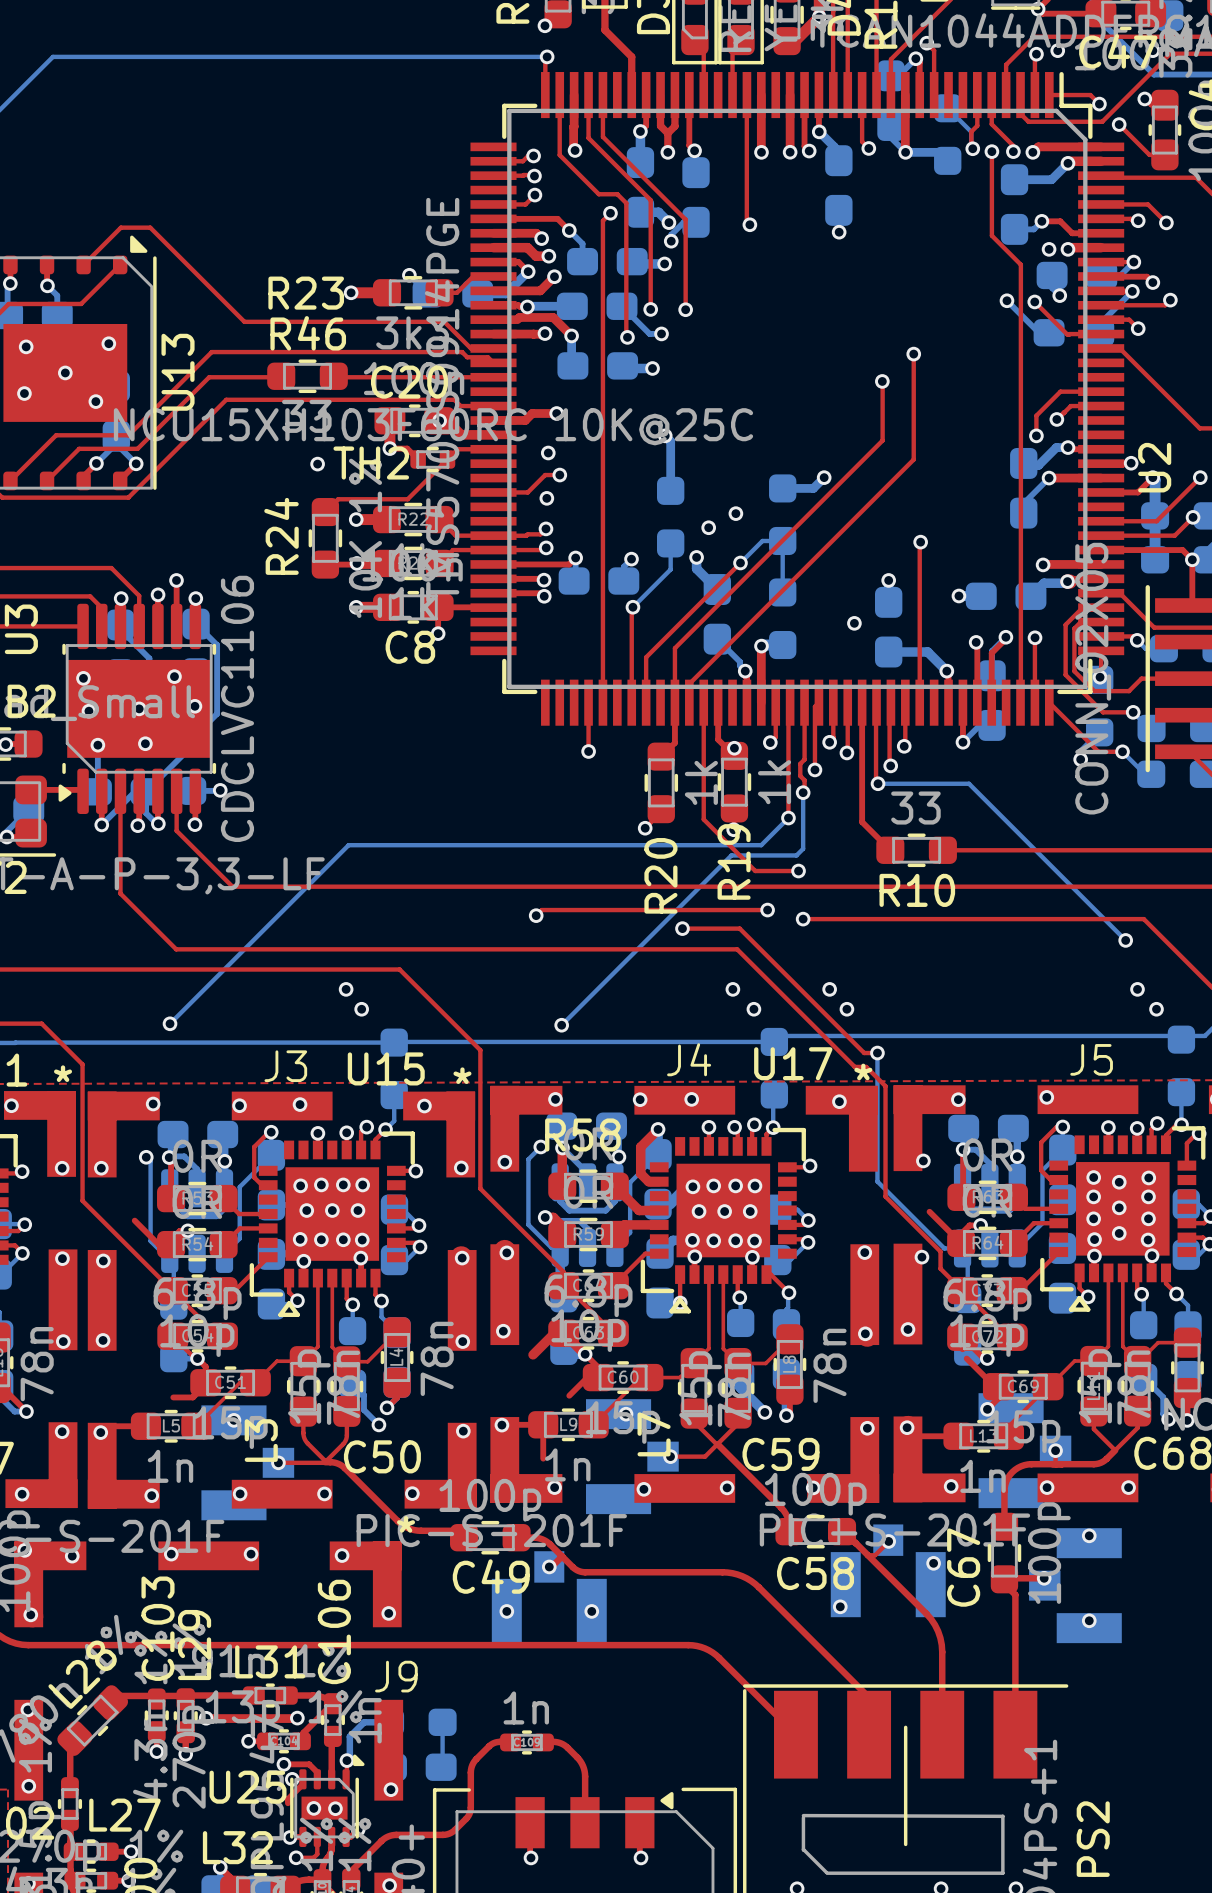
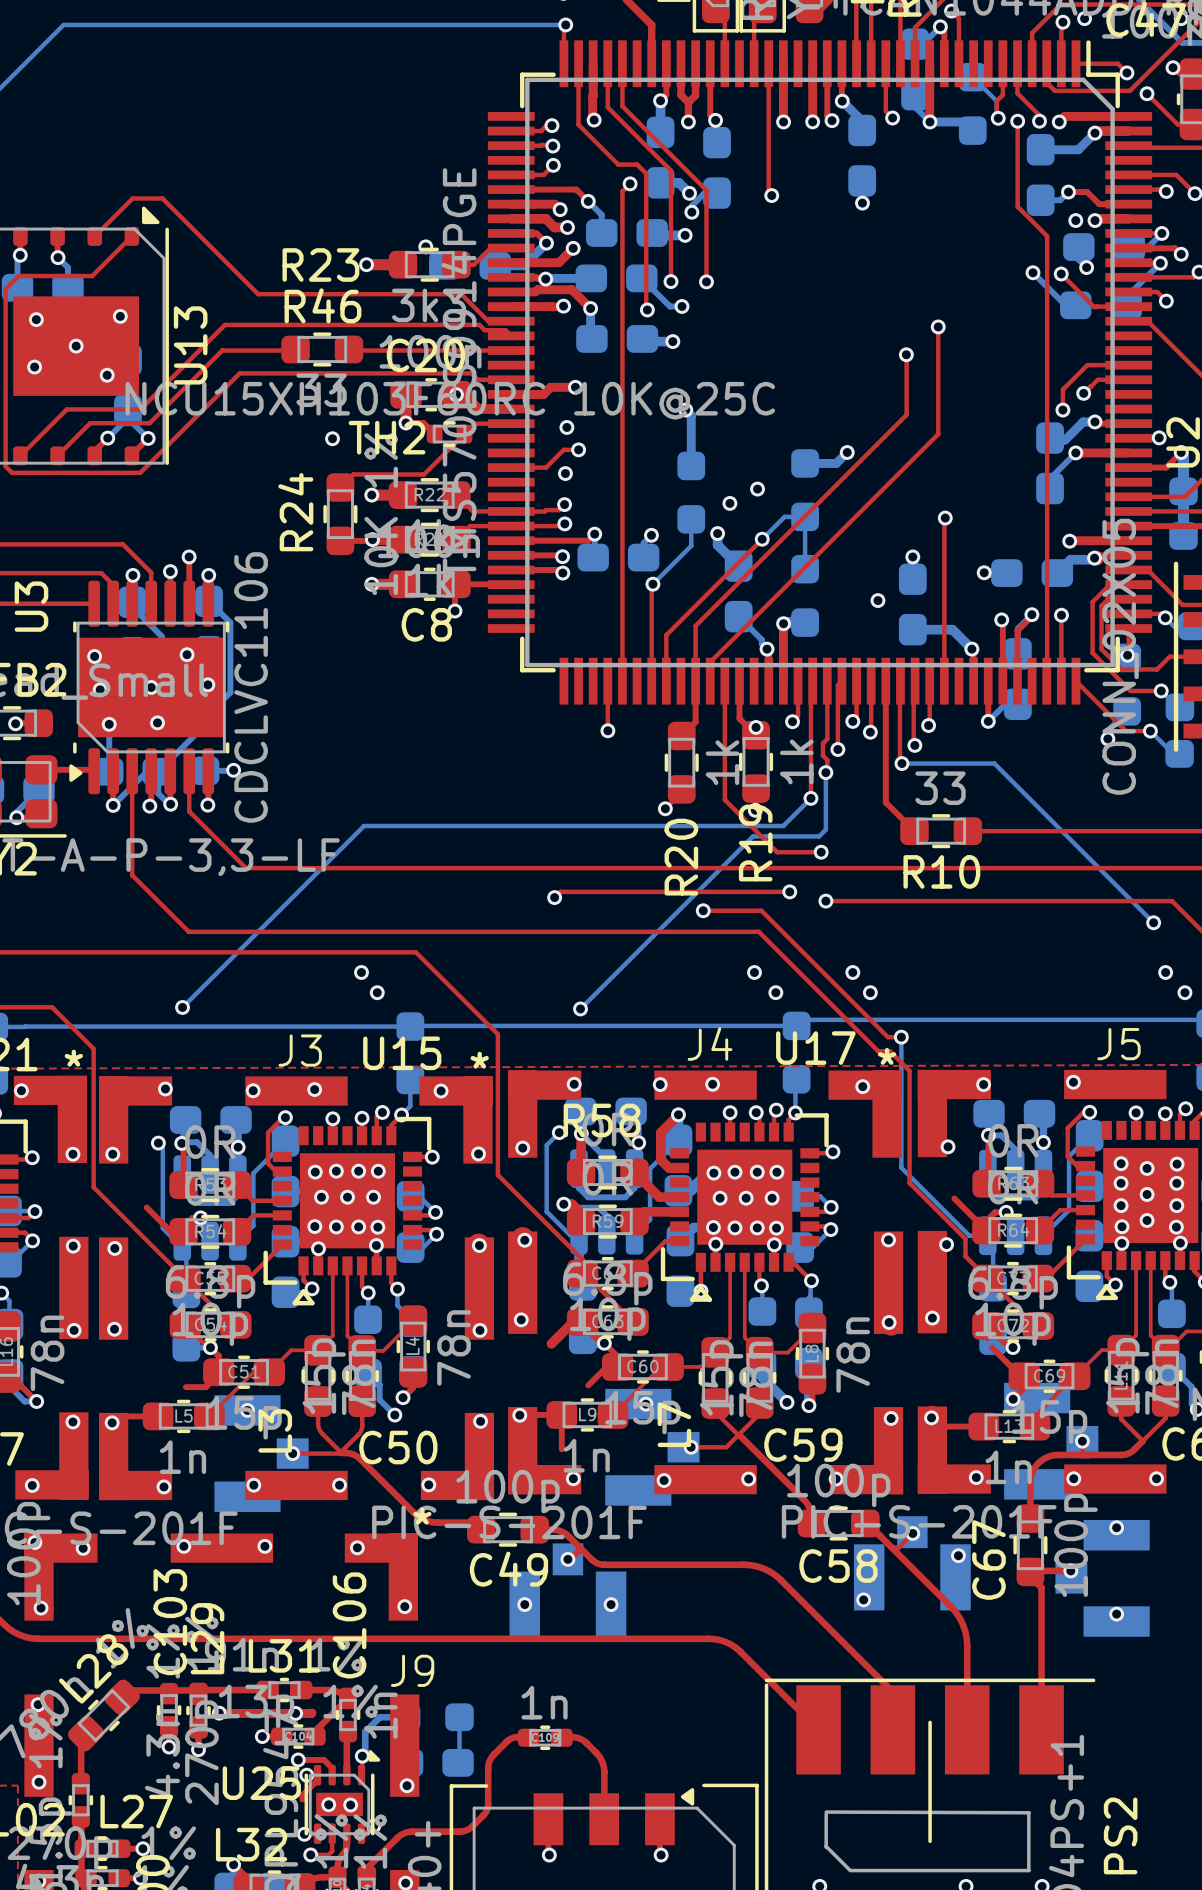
via position: (297, 1718) -> (295, 1713)

